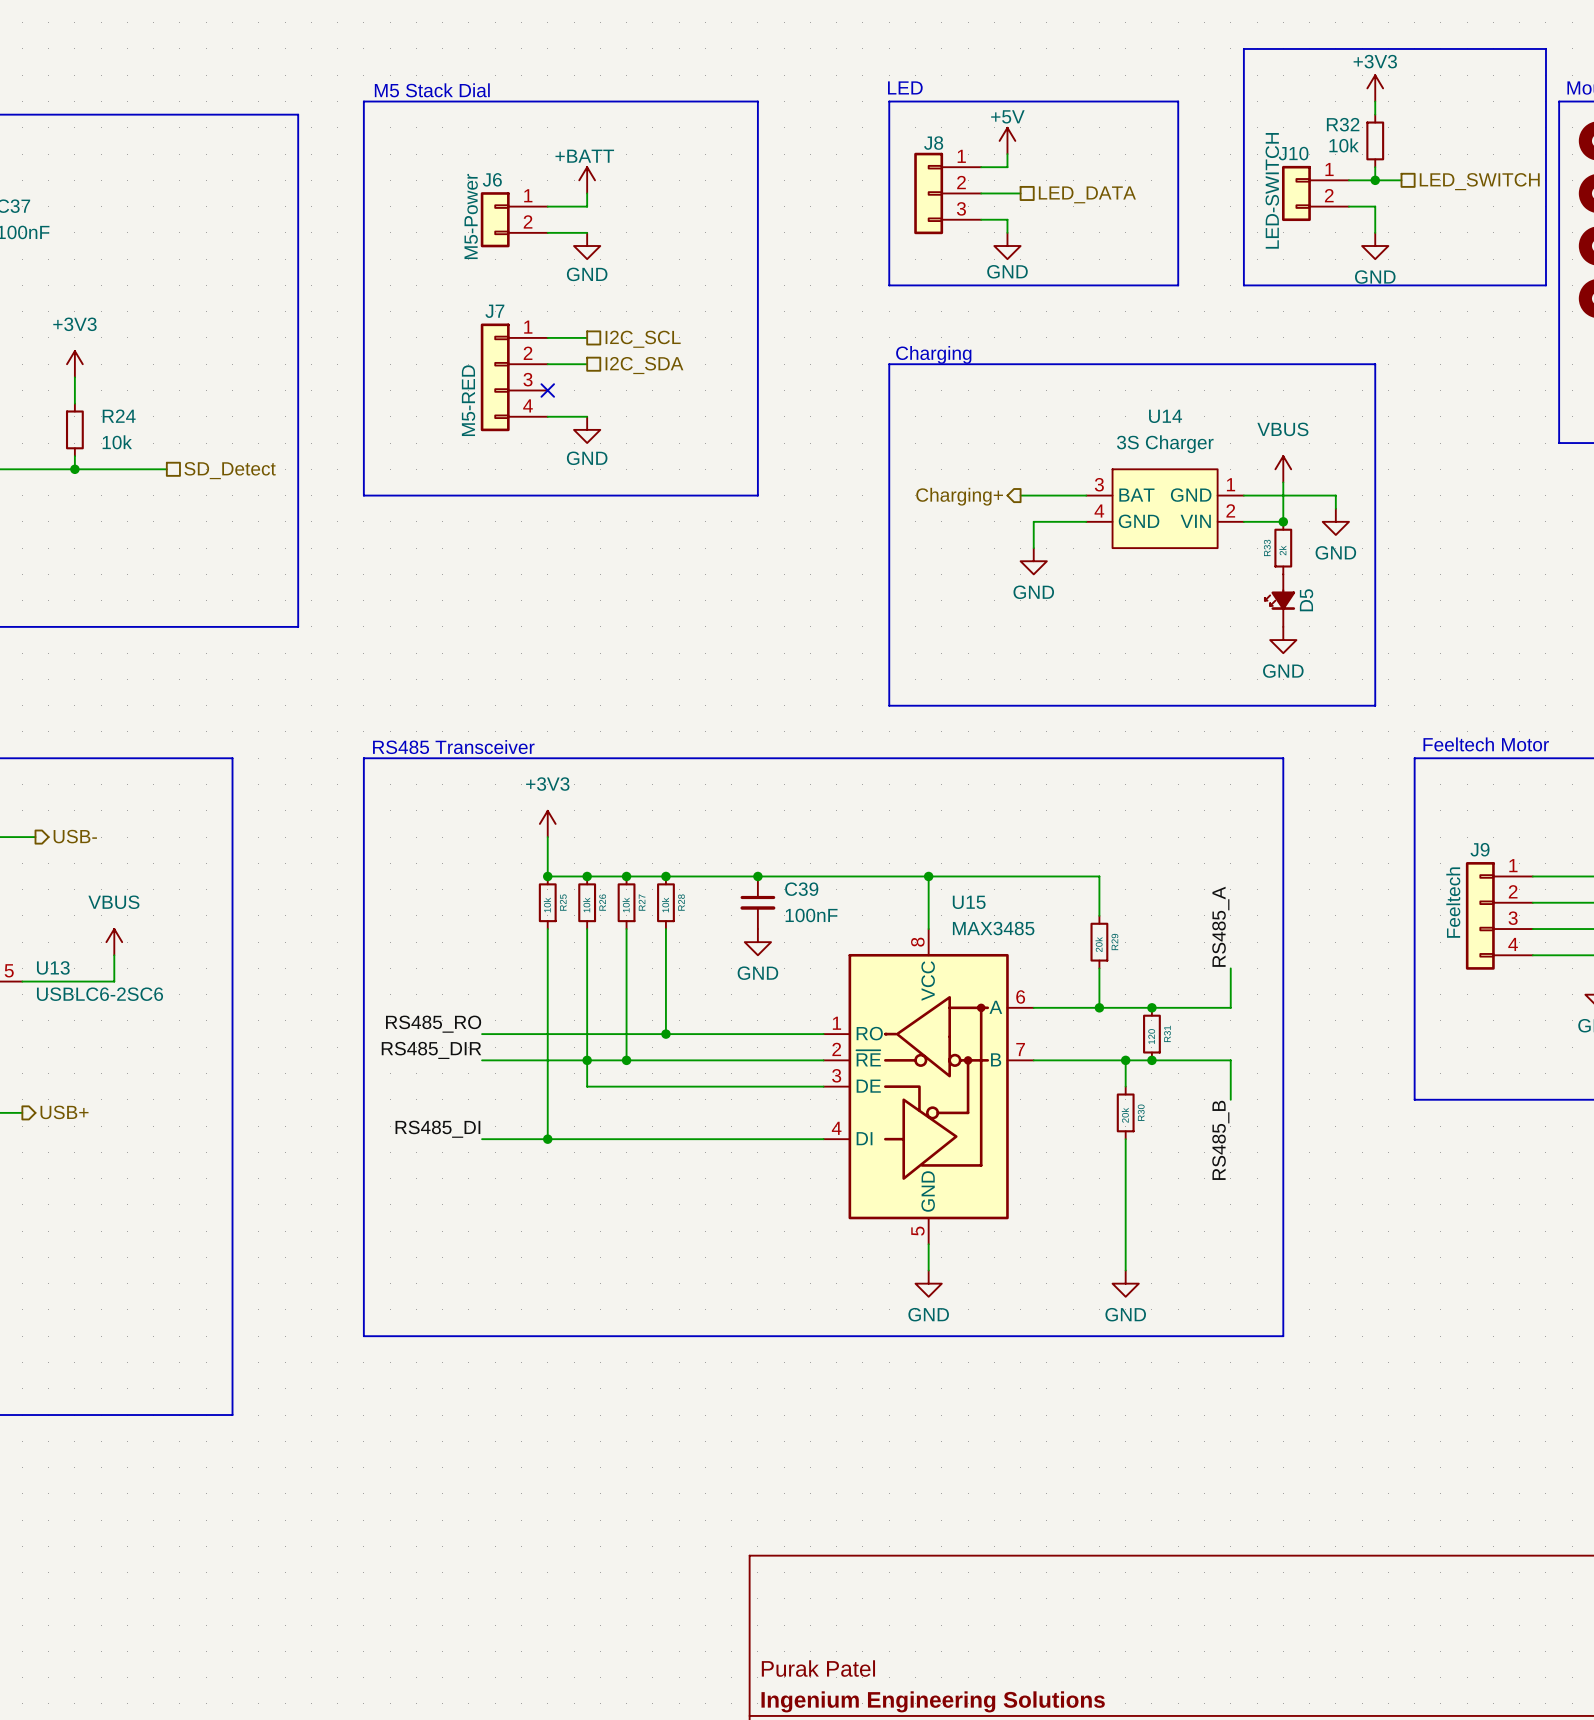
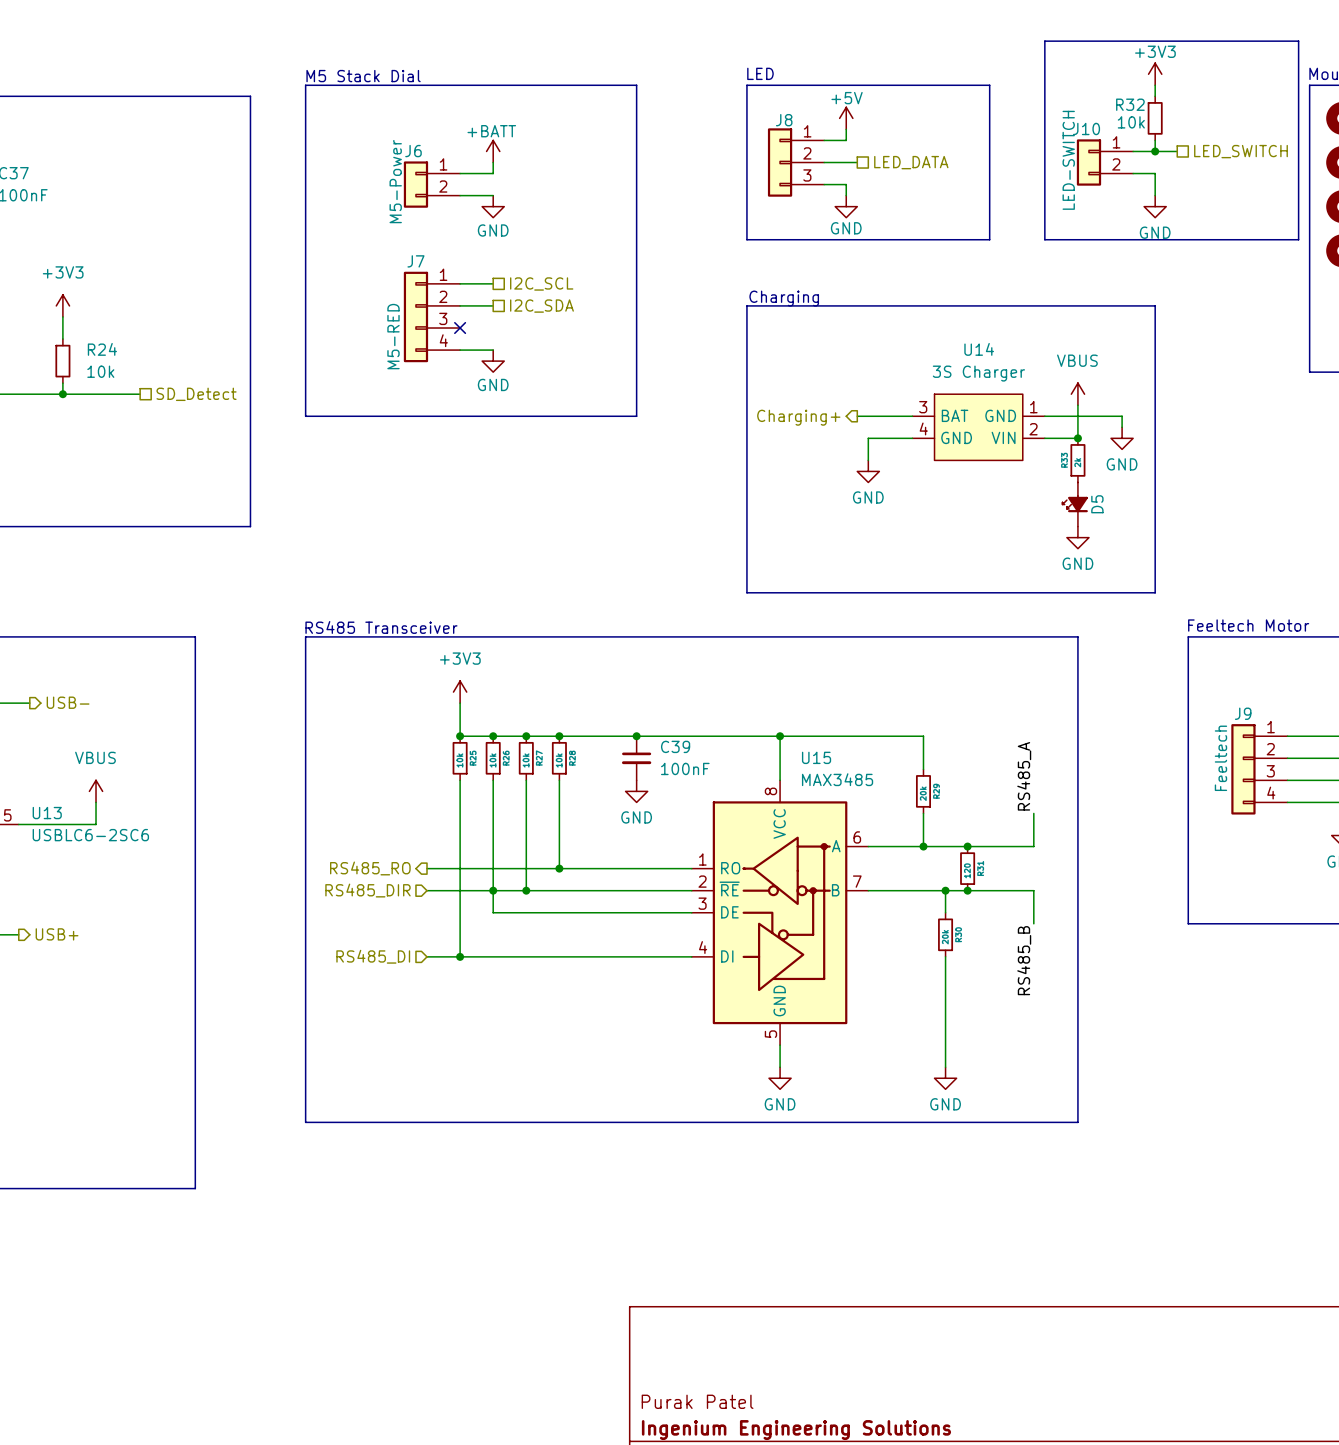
label: RS485_RO (433, 1024) -> none
wire: (482, 1034) (508, 1034) -> none
hierarchical label: none -> RS485_RO (370, 868)
label: RS485_DIR (431, 1050) -> none
wire: (482, 1060) (508, 1060) -> none
hierarchical label: none -> RS485_DIR (367, 890)
label: RS485_DI (437, 1129) -> none
wire: (482, 1139) (508, 1139) -> none
hierarchical label: none -> RS485_DI (373, 956)

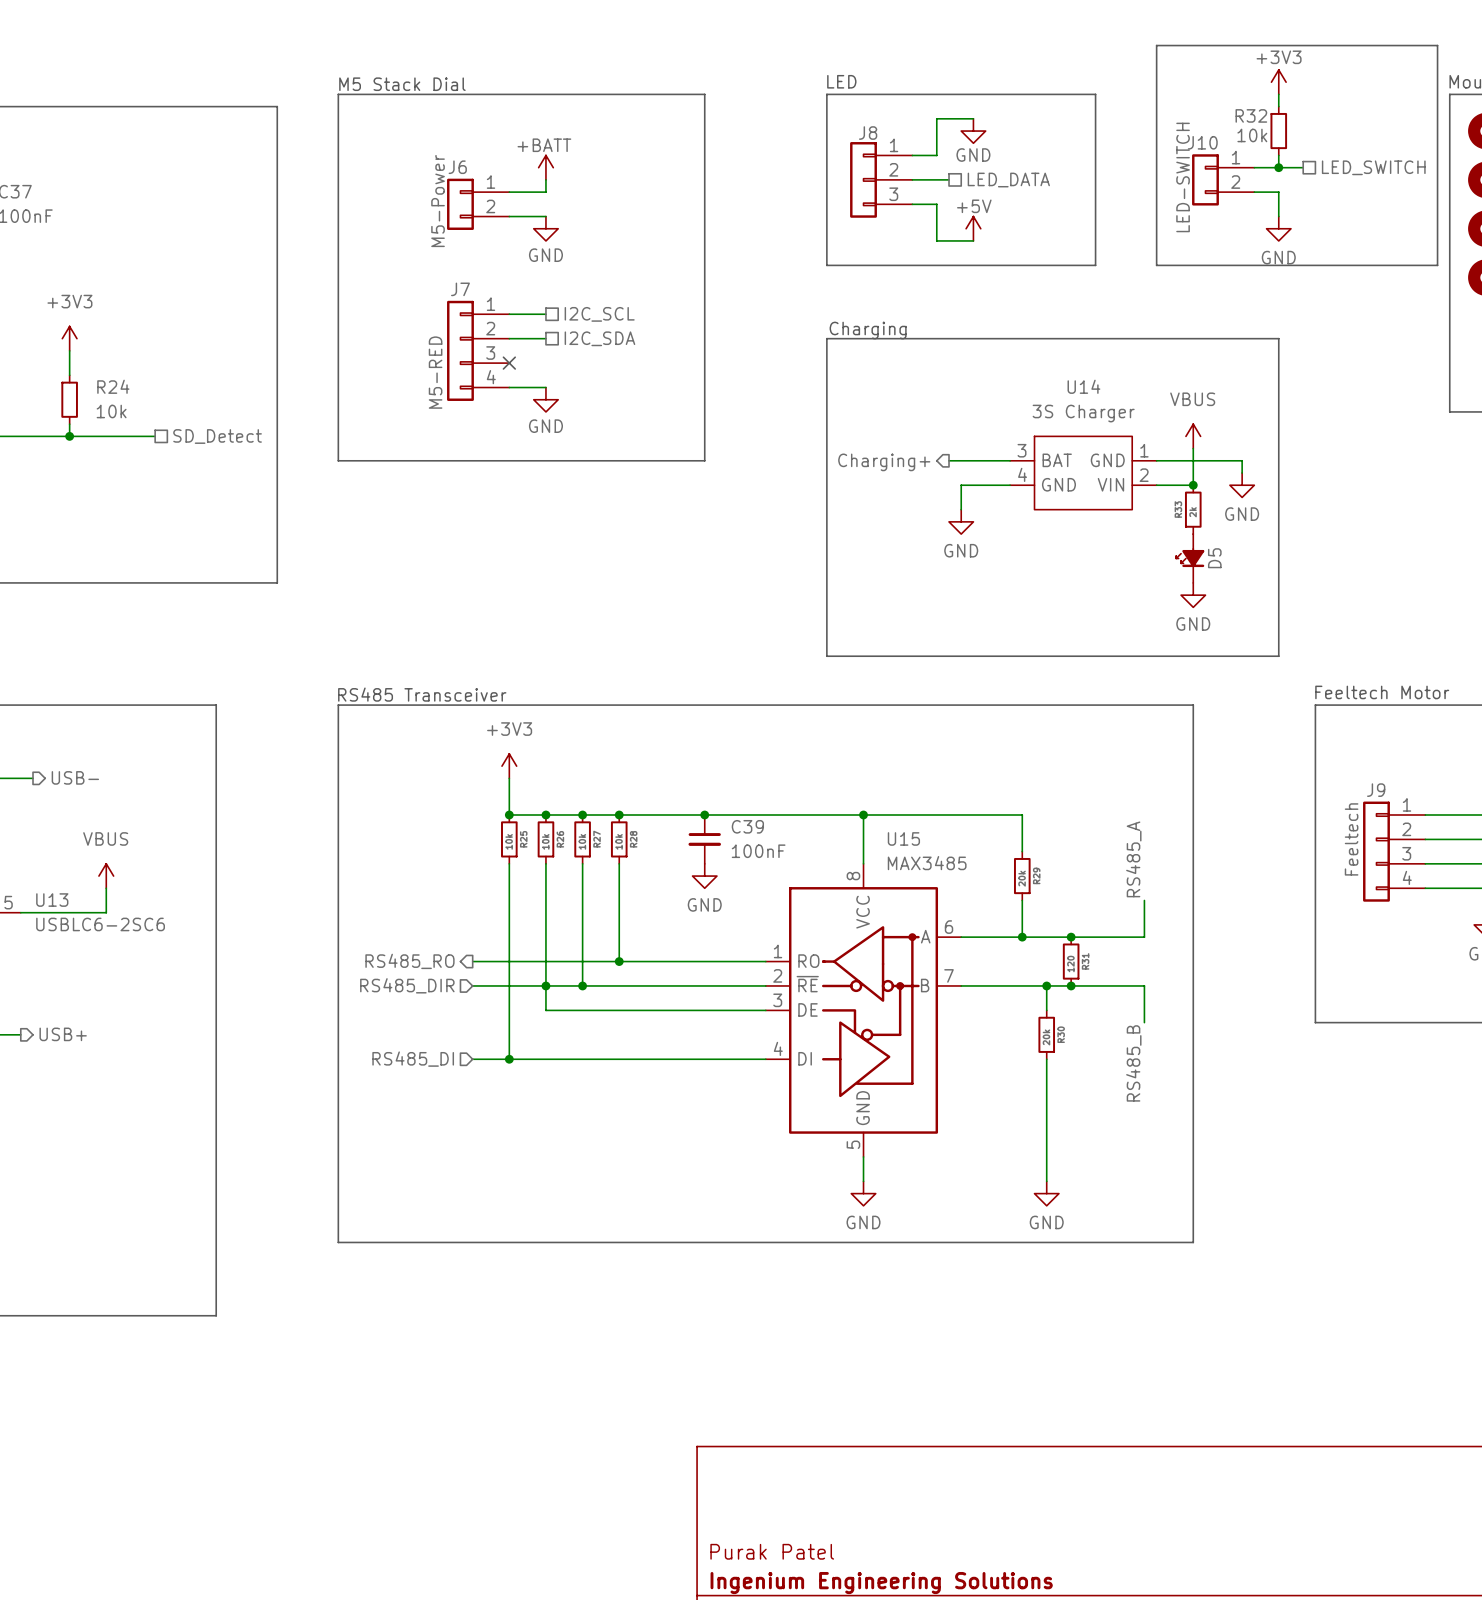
wire: none -> (973, 118) (936, 118) (936, 143)
power symbol position: +5V (846, 118) -> +5V (973, 228)
wire: none -> (936, 216) (936, 240) (973, 240)
power symbol position: GND (846, 206) -> GND (973, 131)

